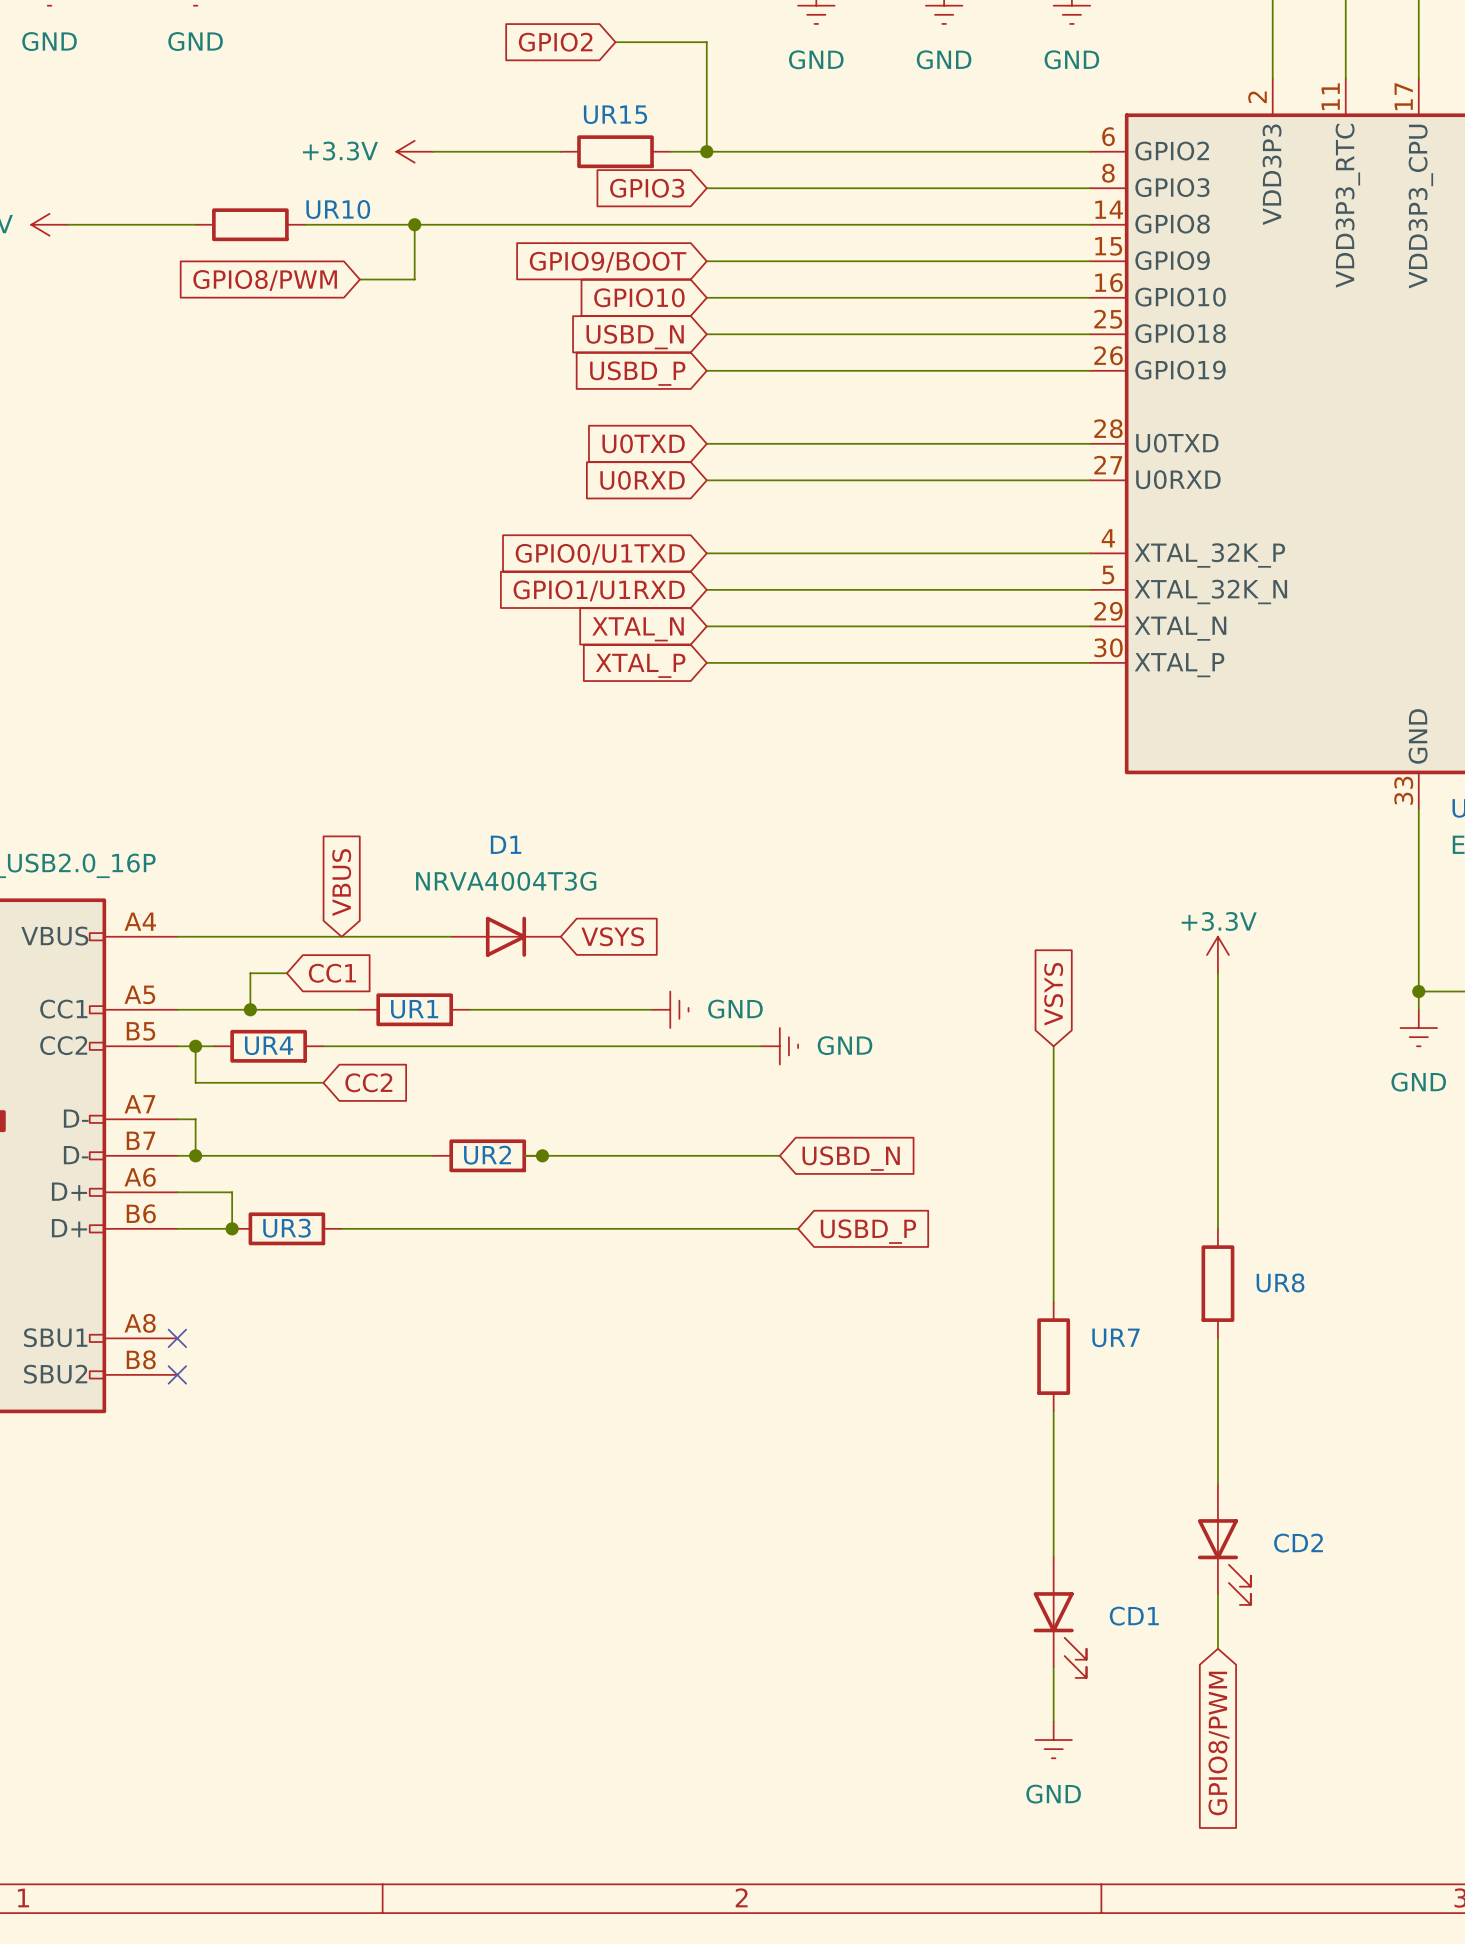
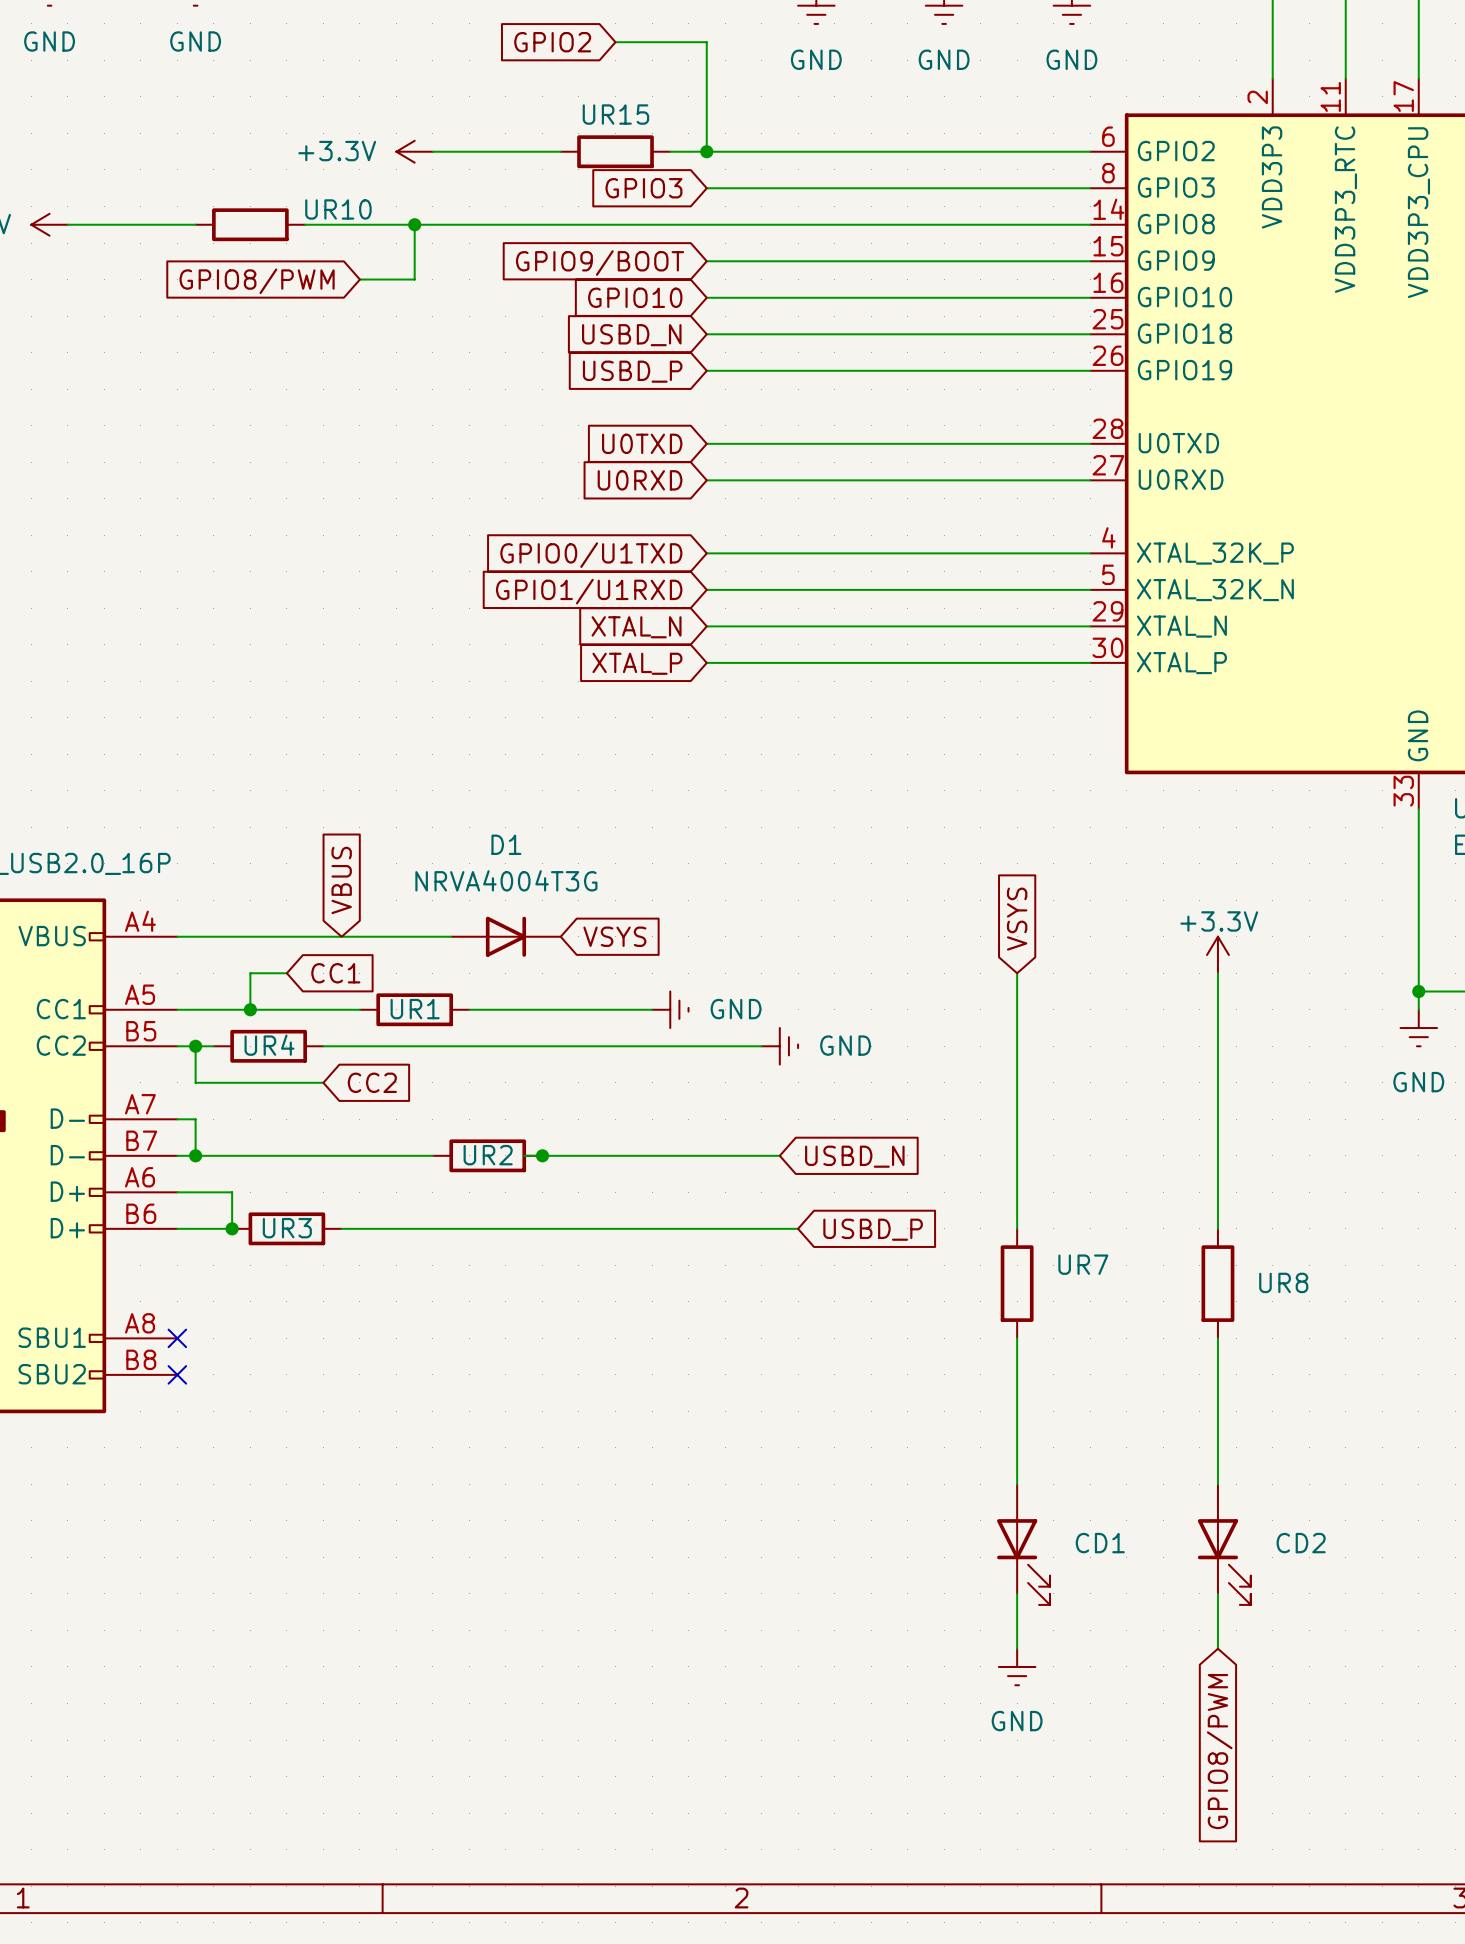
global label position: VSYS (1053, 994) -> VSYS (1017, 919)
wire: (1053, 1046) (1053, 1301) -> (1017, 973) (1017, 1228)
UR7 position: (1053, 1356) -> (1017, 1283)
wire: (1053, 1411) (1053, 1557) -> (1017, 1338) (1017, 1484)
CD1 position: (1060, 1617) -> (1023, 1544)
wire: (1053, 1666) (1053, 1721) -> (1017, 1593) (1017, 1648)
power symbol position: GND (1053, 1740) -> GND (1017, 1666)

